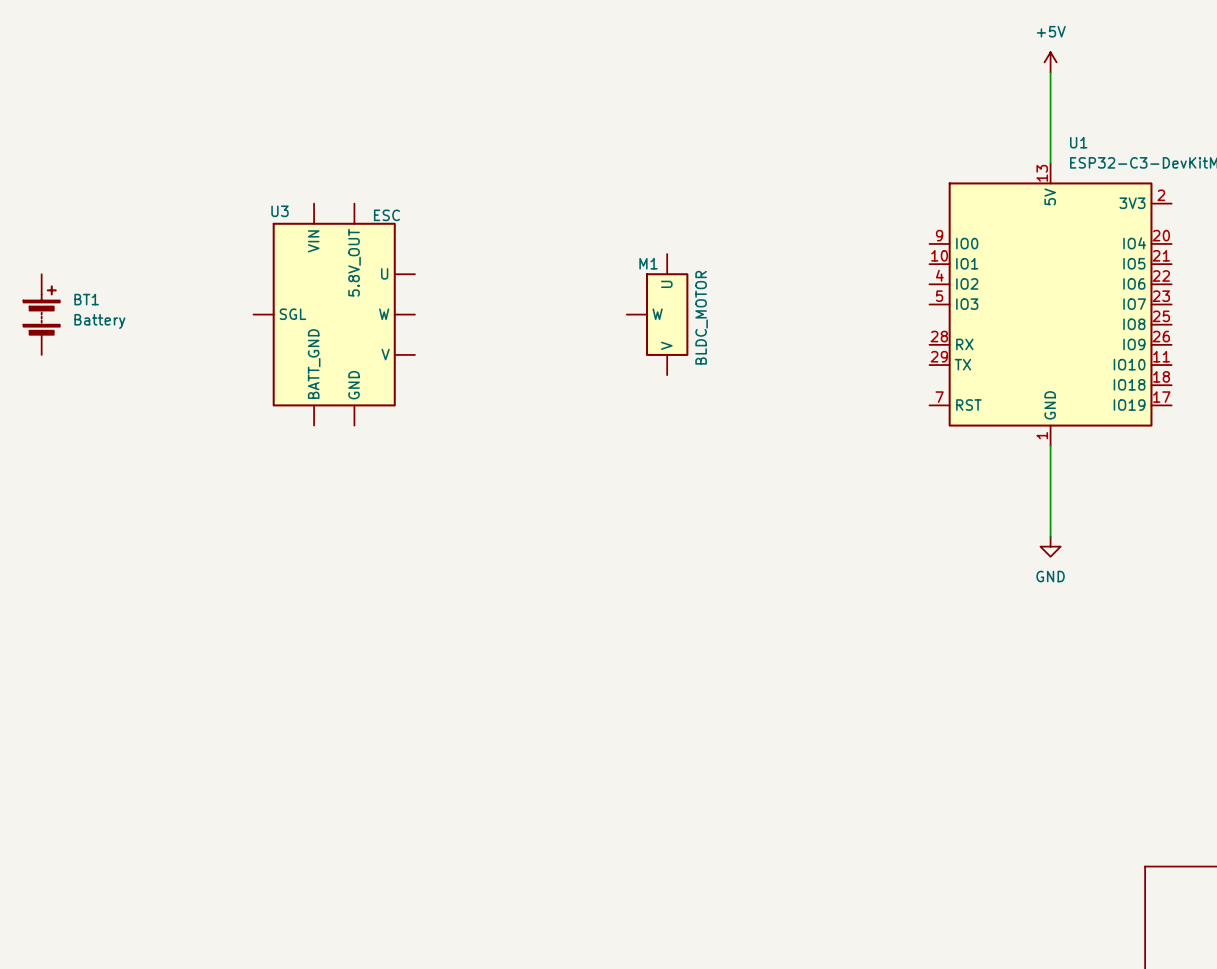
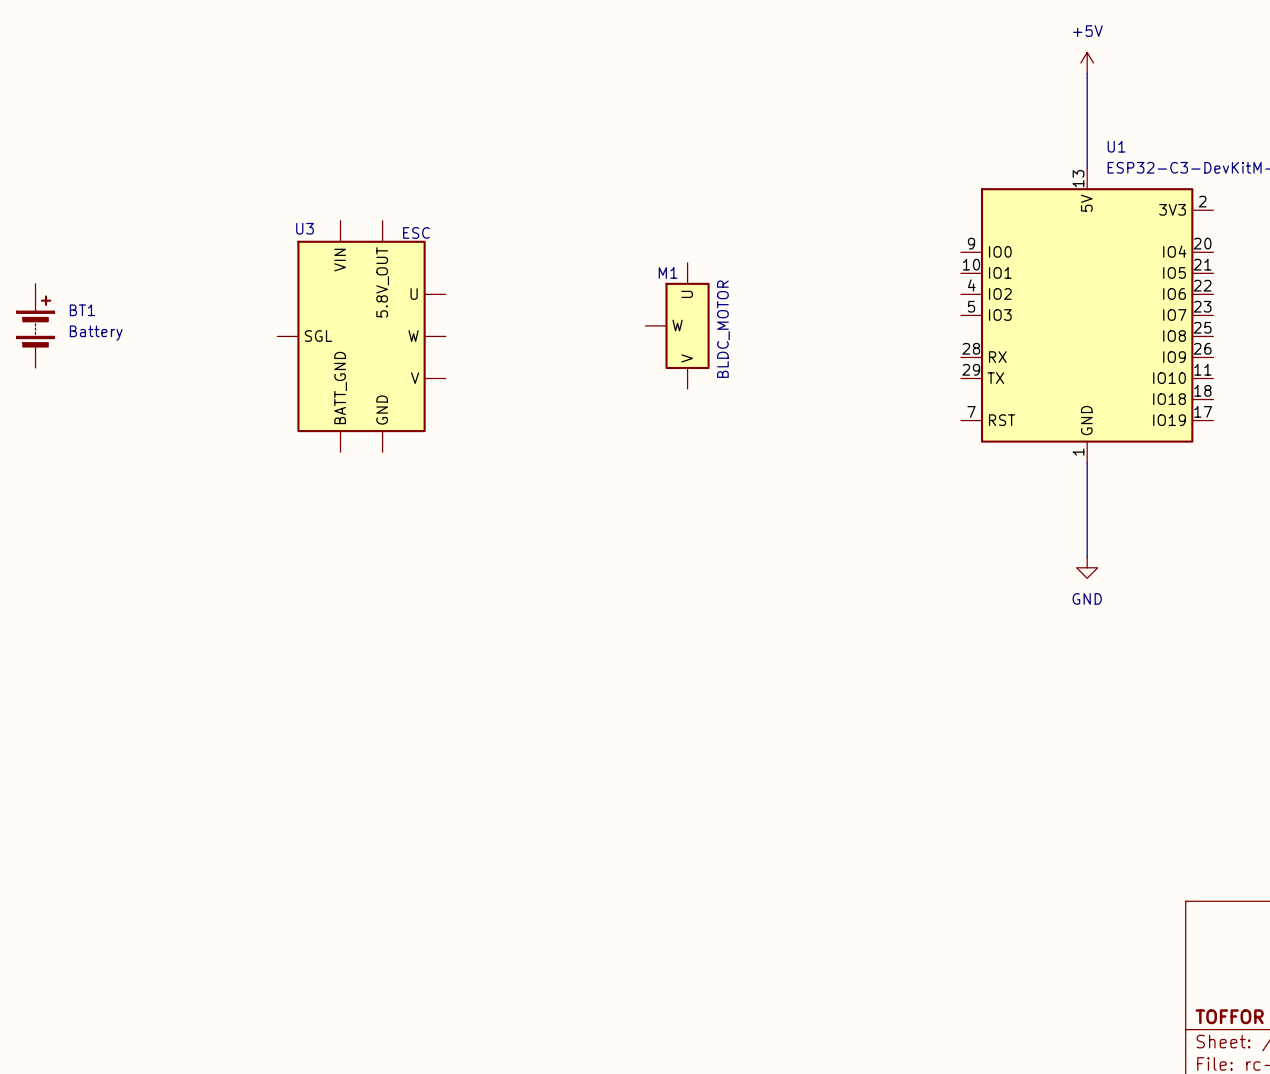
U3 position: (334, 314) -> (361, 336)

